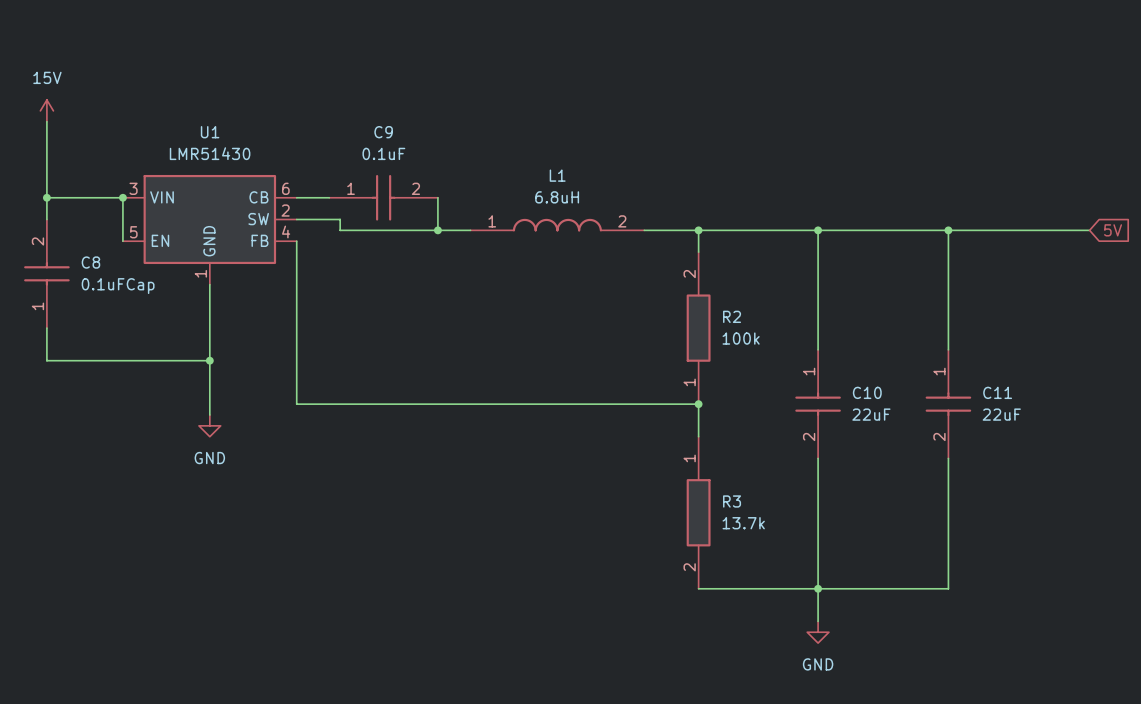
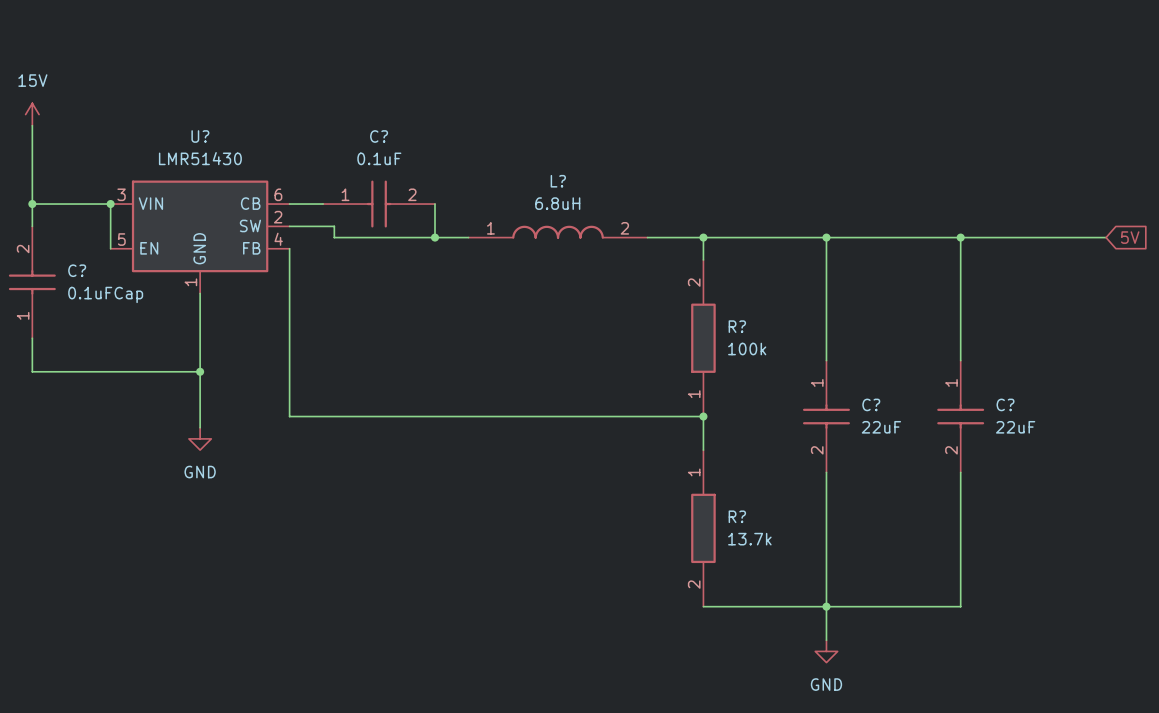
U1 name: U1 (210, 132) -> U? (200, 136)
C9 name: C9 (383, 132) -> C? (379, 136)
L1 name: L1 (557, 175) -> L? (558, 181)
C8 name: C8 (90, 262) -> C? (77, 270)
R2 name: R2 (732, 316) -> R? (737, 326)
C10 name: C10 (867, 392) -> C? (871, 404)
C11 name: C11 (997, 392) -> C? (1005, 404)
R3 name: R3 (732, 501) -> R? (737, 516)

